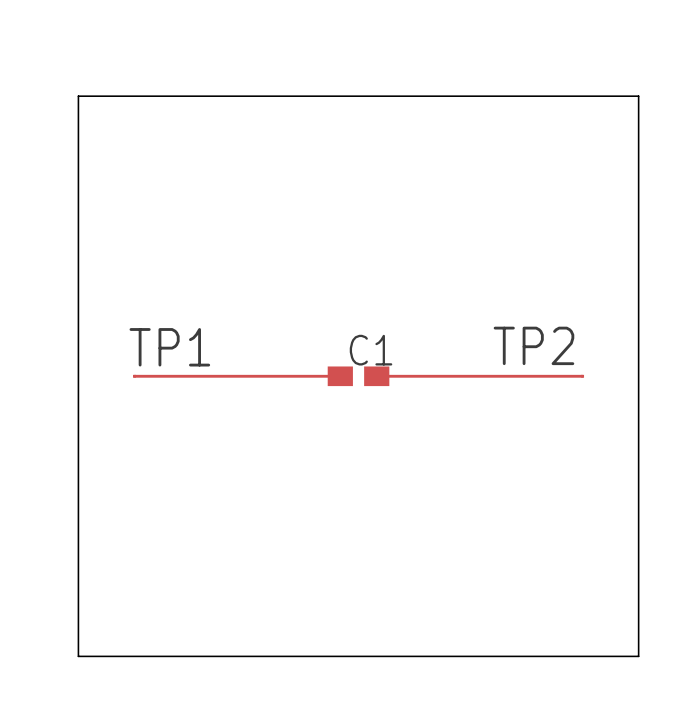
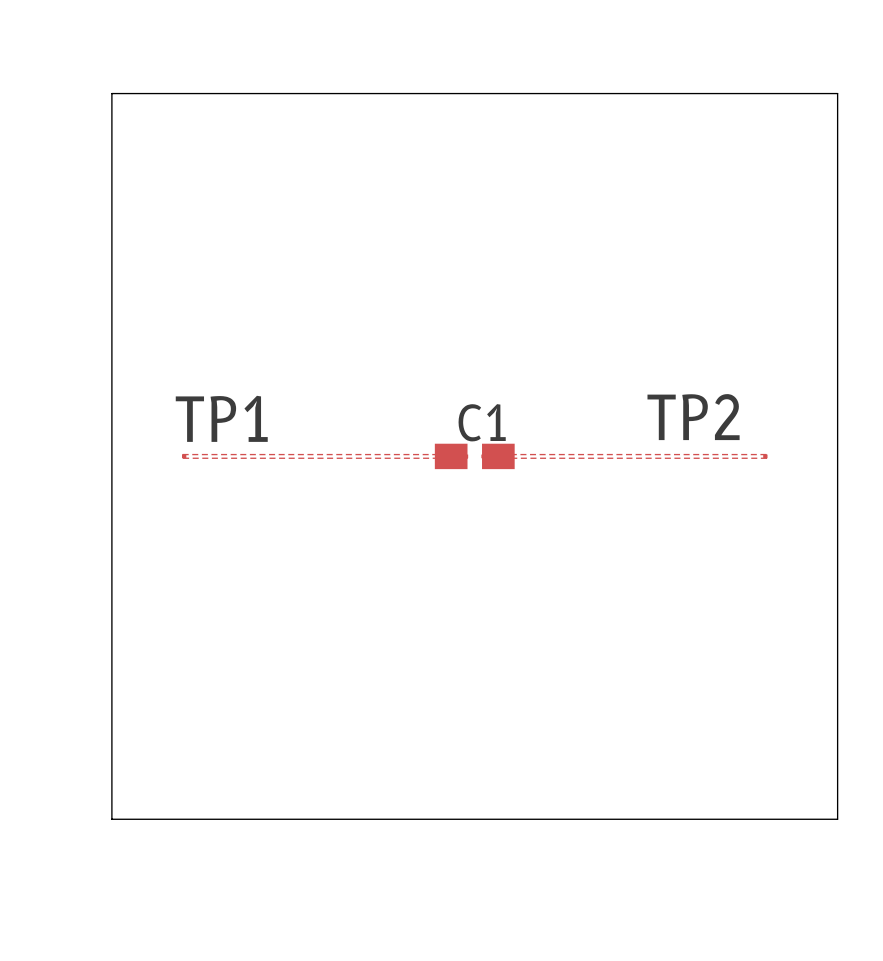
zone outline: none -> (182, 454) (467, 454) (467, 458) (182, 458) (182, 454)
zone outline: none -> (482, 454) (766, 454) (766, 458) (482, 458) (482, 454)
track: (134, 376) (340, 376) -> none
track: (376, 376) (582, 376) -> none

